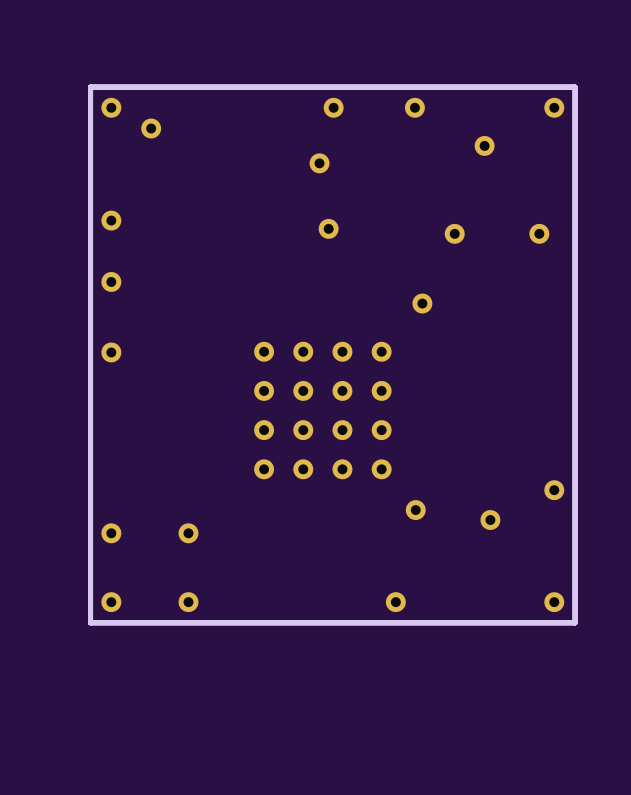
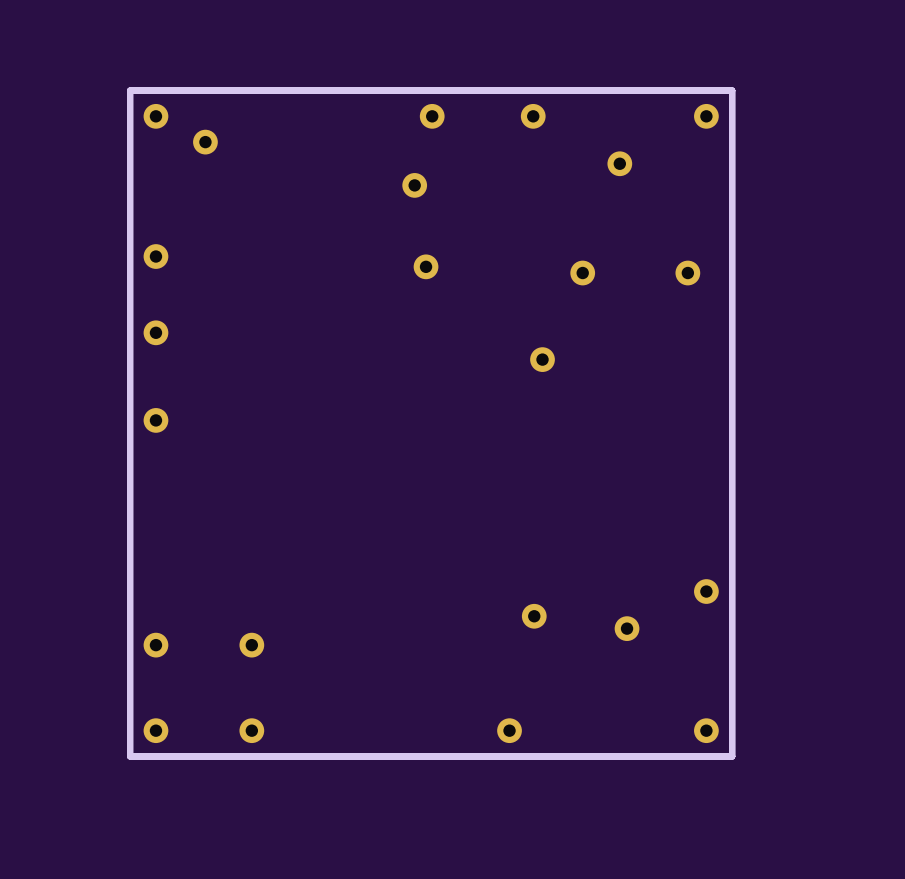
part: (322, 410) -> none

